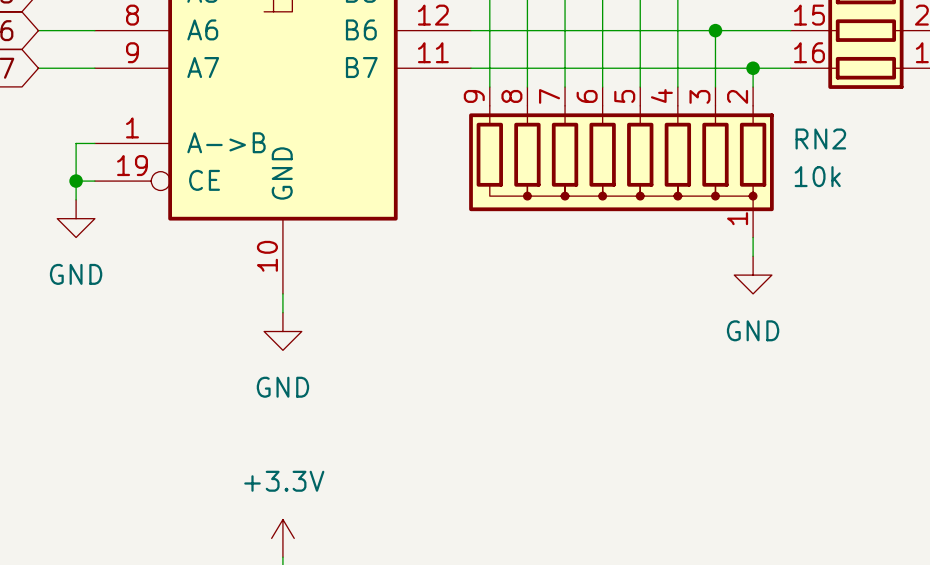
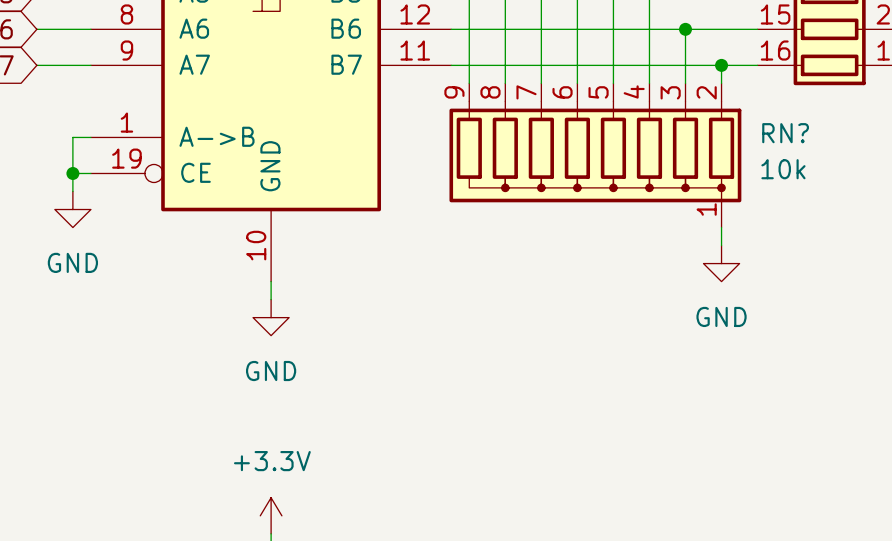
RN2 name: RN2 (820, 138) -> RN? (785, 133)

